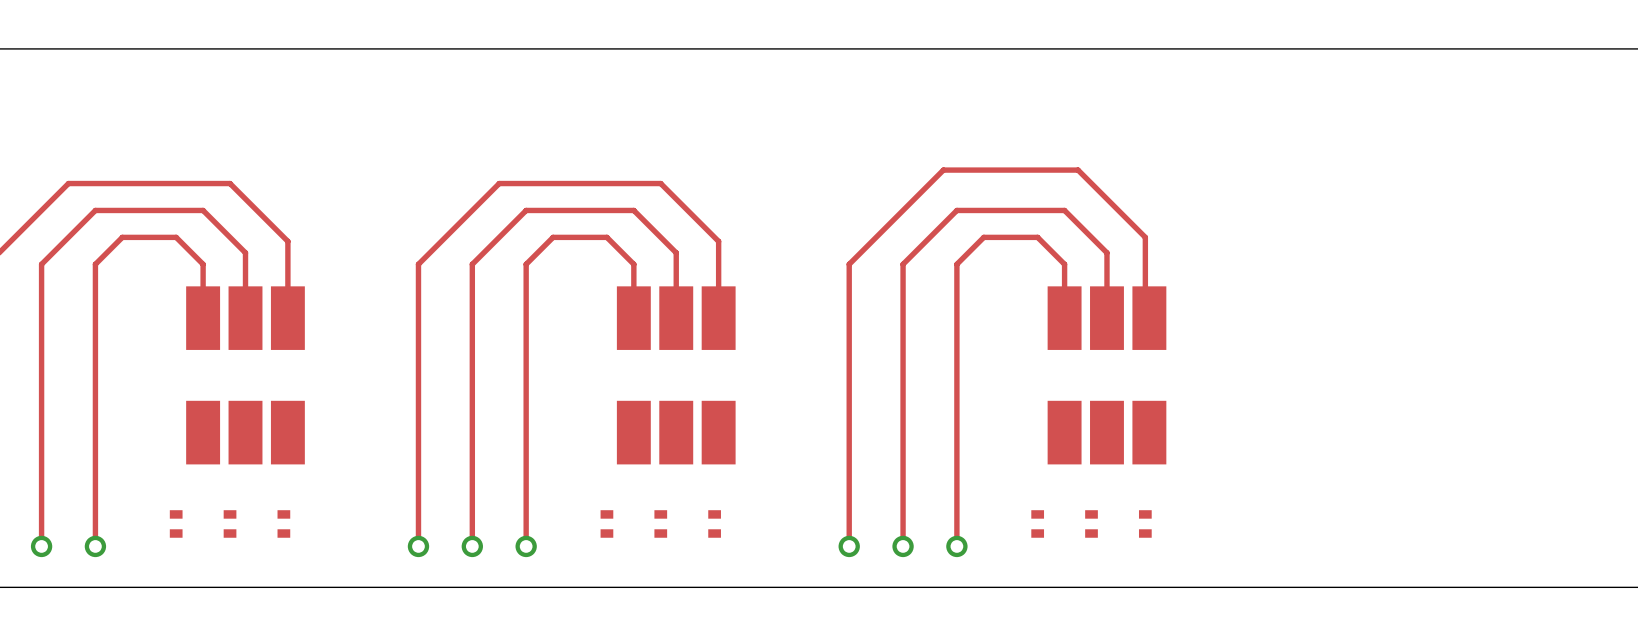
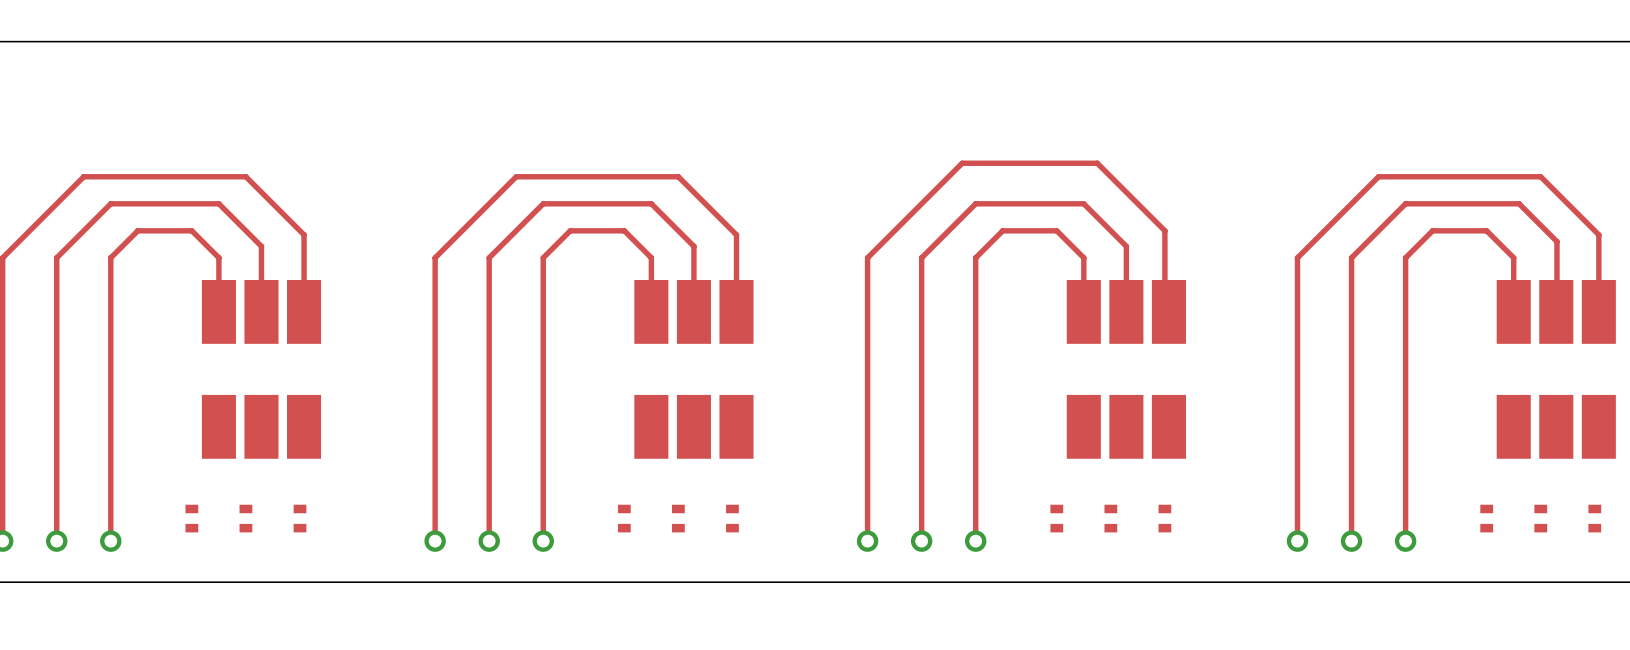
top track: none -> (1513, 311) (1513, 257) (1486, 230) (1432, 230) (1405, 257) (1405, 541)
top track: none -> (1556, 311) (1556, 241) (1519, 203) (1405, 203) (1351, 257) (1351, 541)
top track: none -> (1598, 311) (1598, 234) (1540, 176) (1378, 176) (1297, 257) (1297, 541)
part: none -> (1556, 369)
part: none -> (1486, 518)
part: none -> (1540, 518)
part: none -> (1594, 518)
via: none -> (1297, 541)
via: none -> (1351, 541)
via: none -> (1405, 541)

